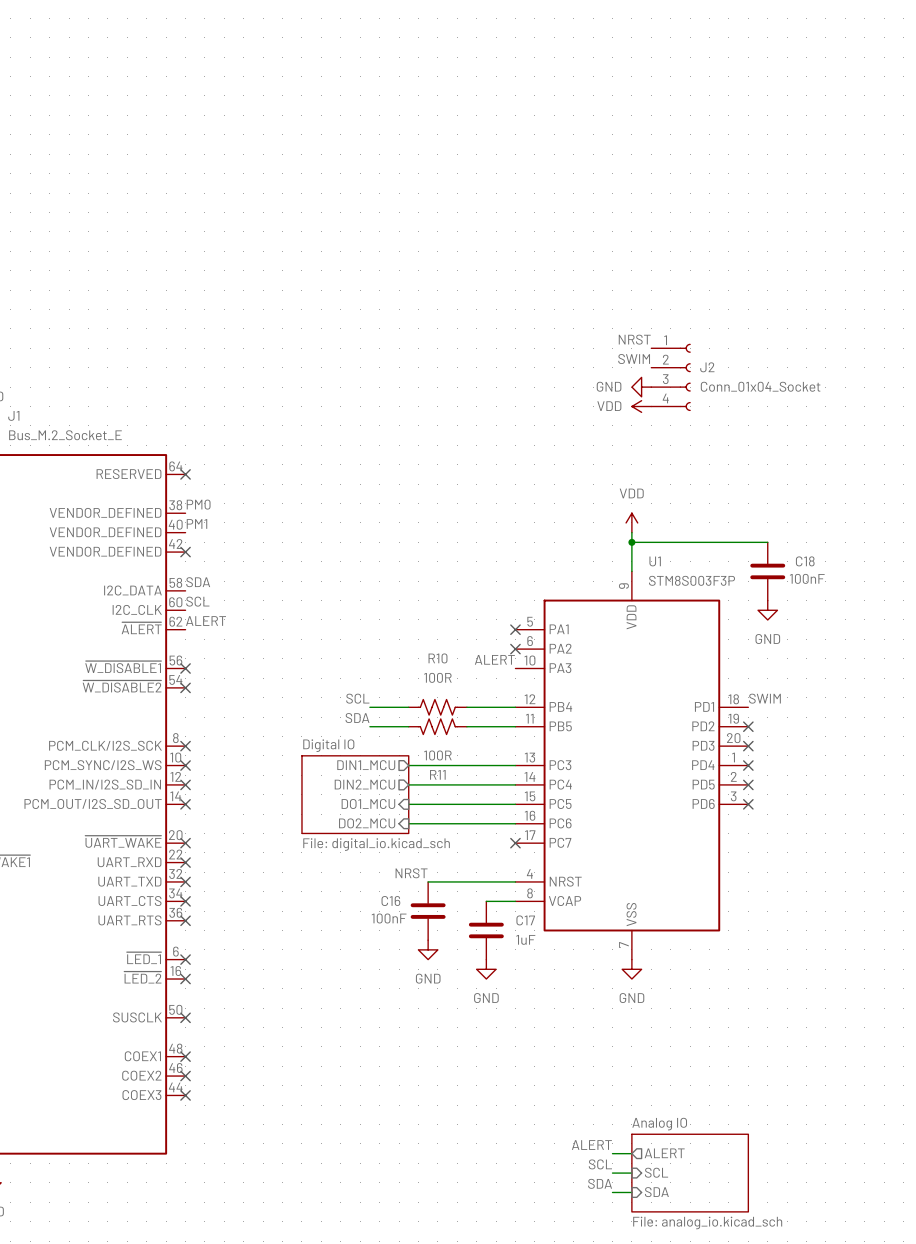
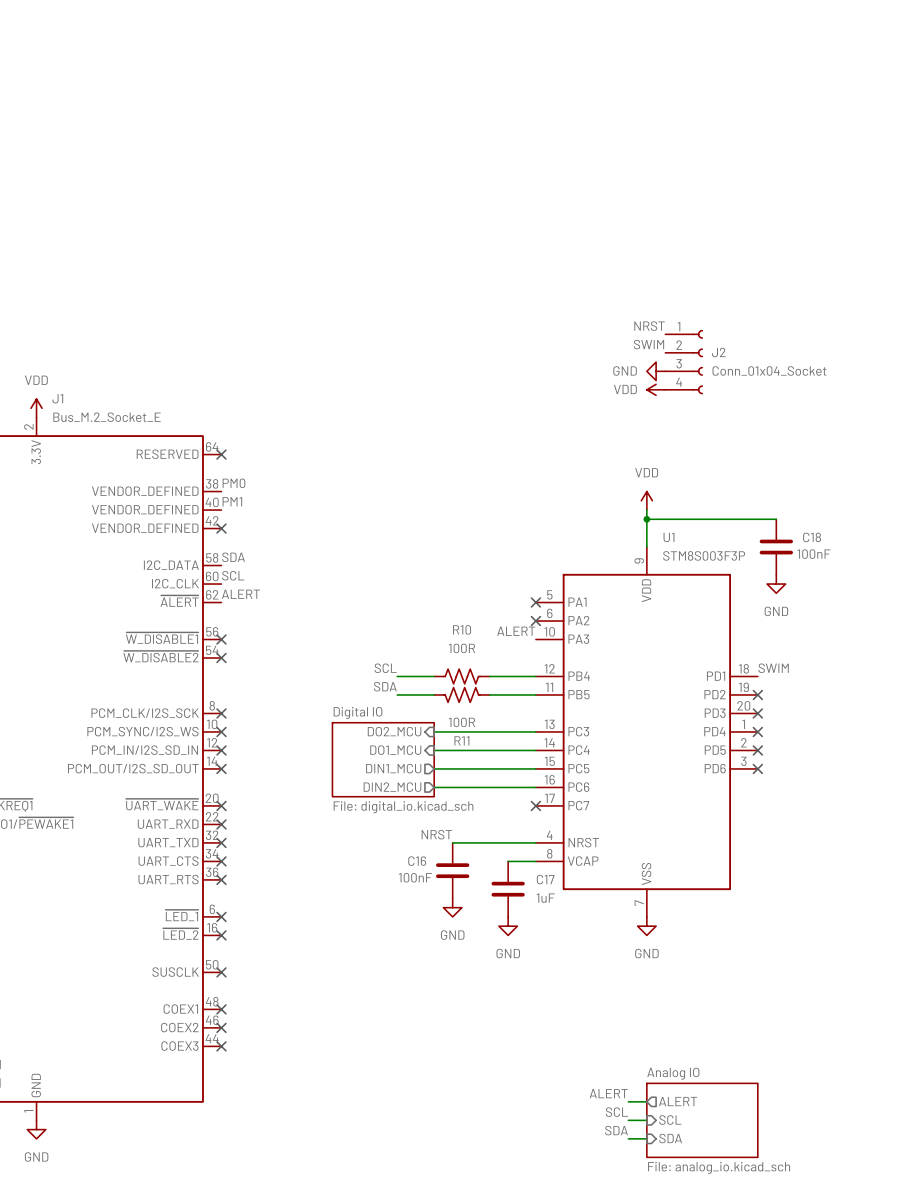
sheet pin shape: output (366, 765) -> input (394, 731)
sheet pin: DIN1_MCU (366, 765) -> DO2_MCU (394, 731)
sheet pin shape: output (364, 784) -> input (395, 750)
sheet pin: DIN2_MCU (364, 784) -> DO1_MCU (395, 750)
sheet pin shape: input (368, 803) -> output (393, 768)
sheet pin: DO1_MCU (368, 803) -> DIN1_MCU (393, 768)
sheet pin shape: input (367, 823) -> output (392, 787)
sheet pin: DO2_MCU (367, 823) -> DIN2_MCU (392, 787)

